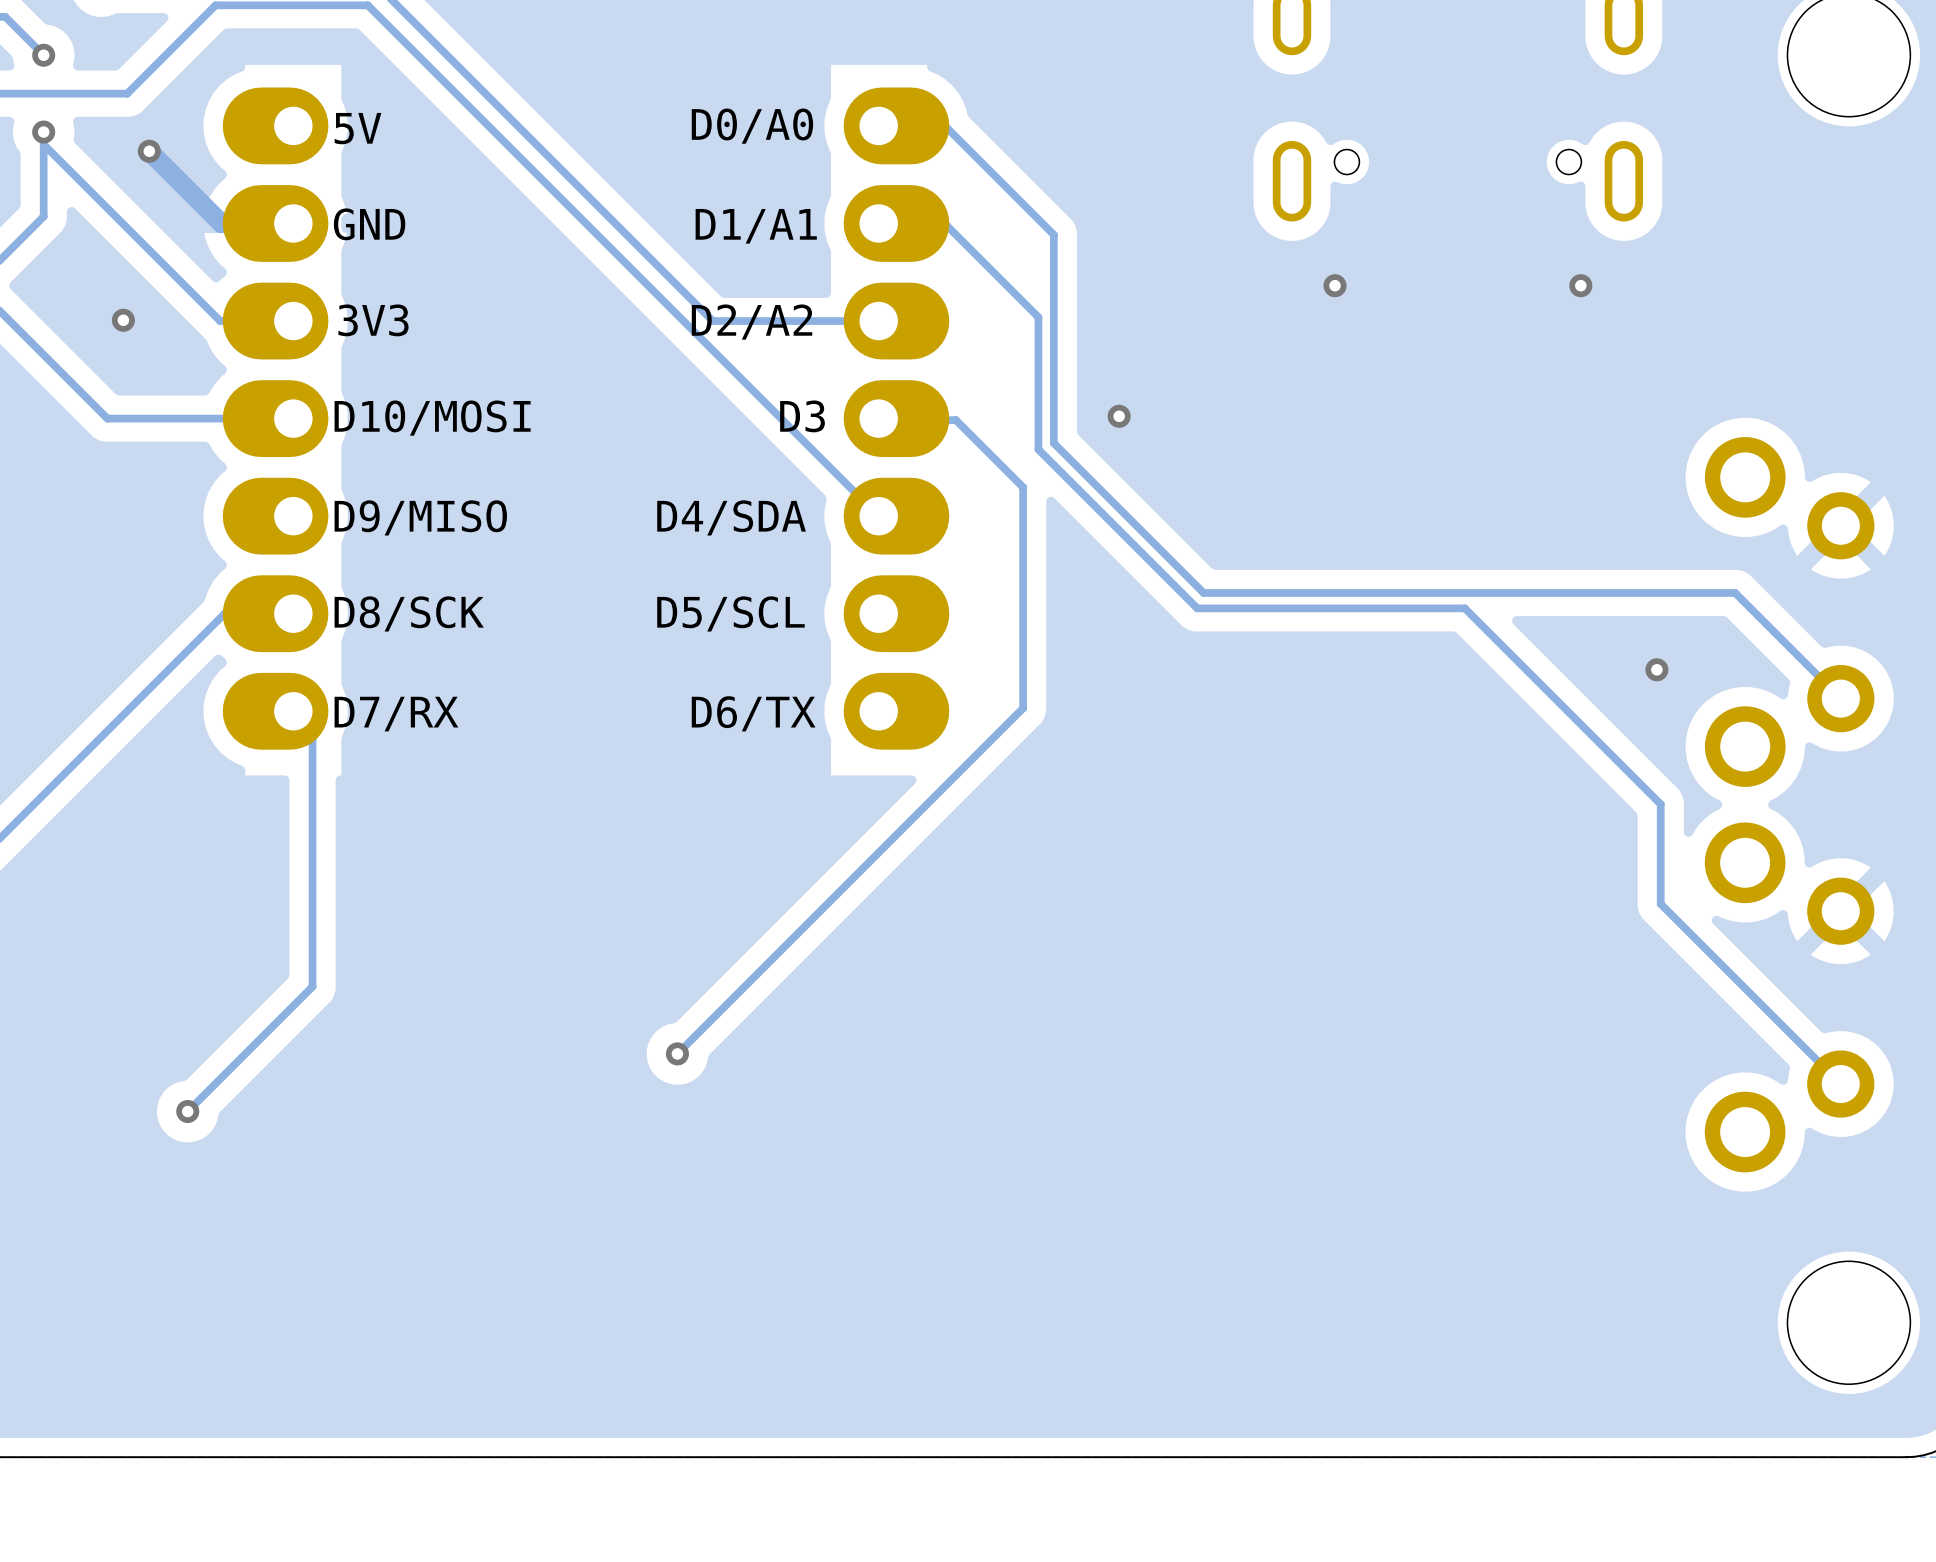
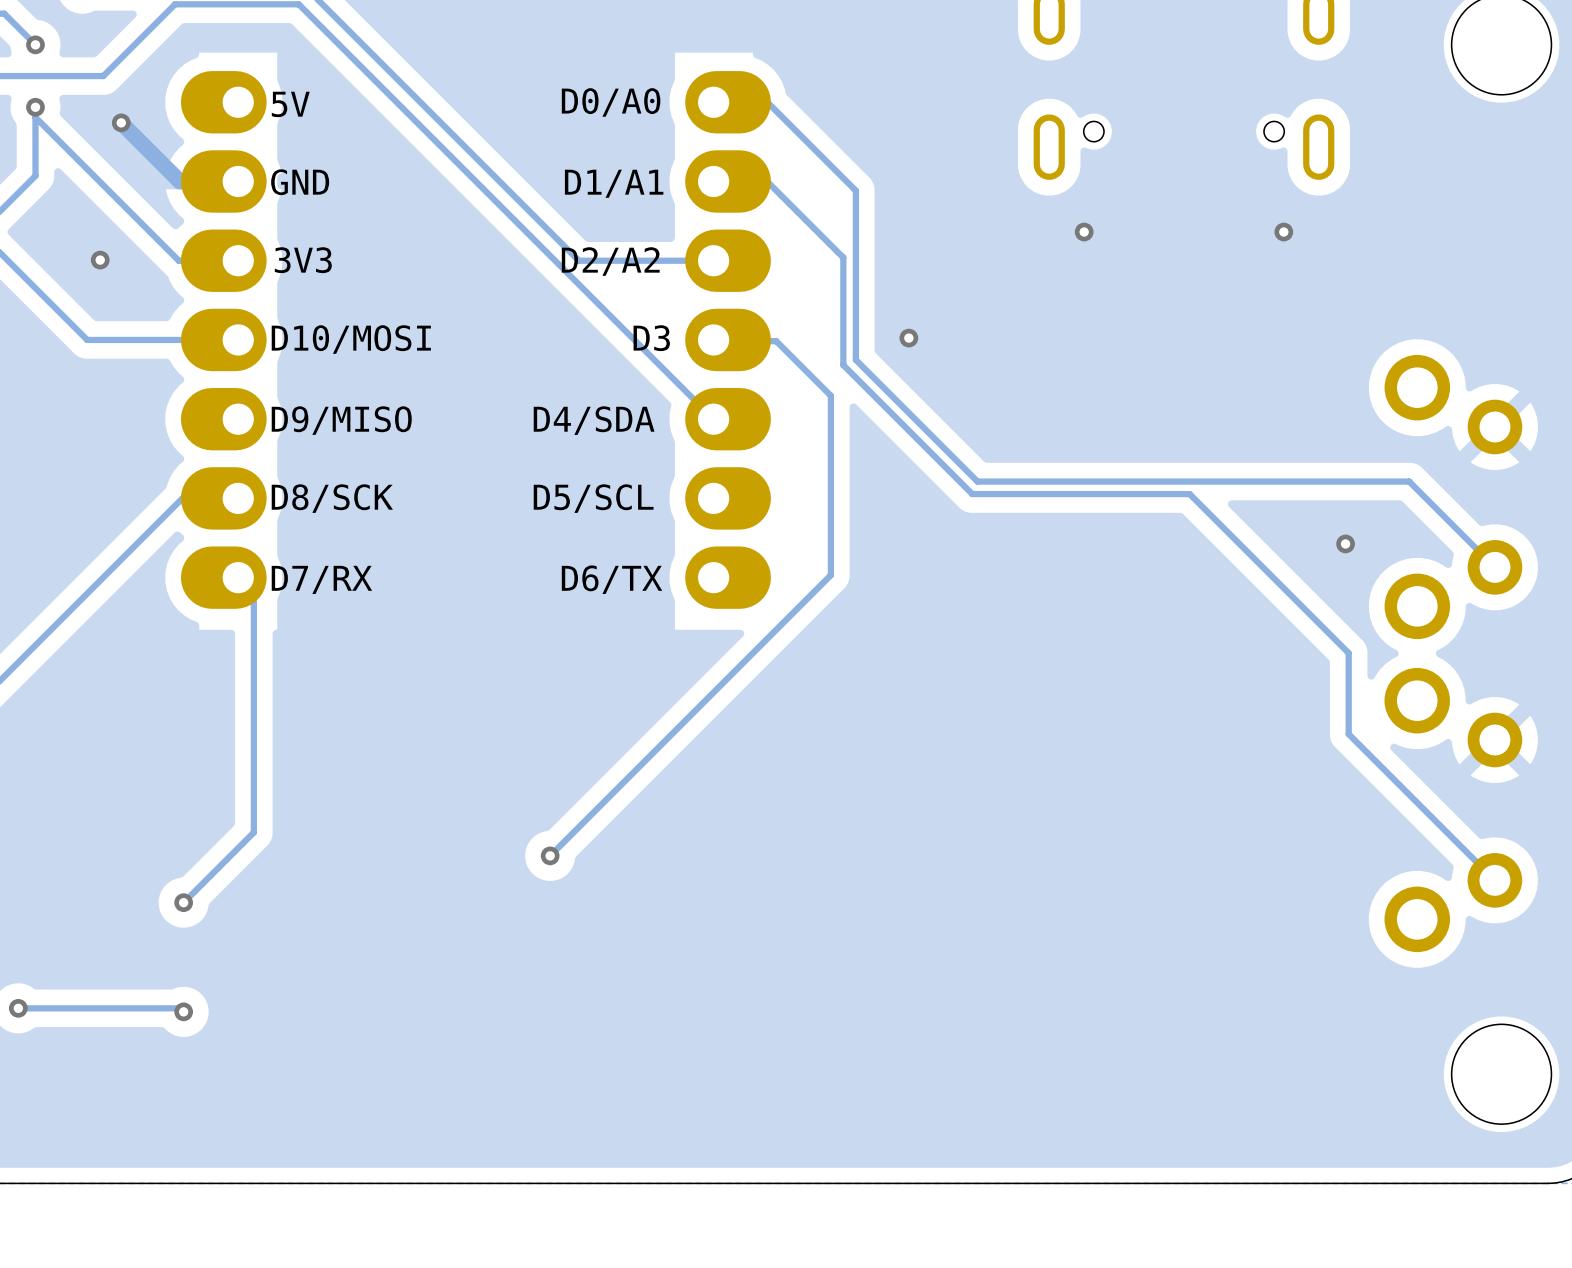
track: (312, 986) (187, 1111) -> (253, 801) (253, 832) (183, 902)
via position: (187, 1111) -> (183, 902)
track: none -> (18, 1008) (180, 1008) (183, 1011)
via: none -> (18, 1008)
via: none -> (183, 1011)

